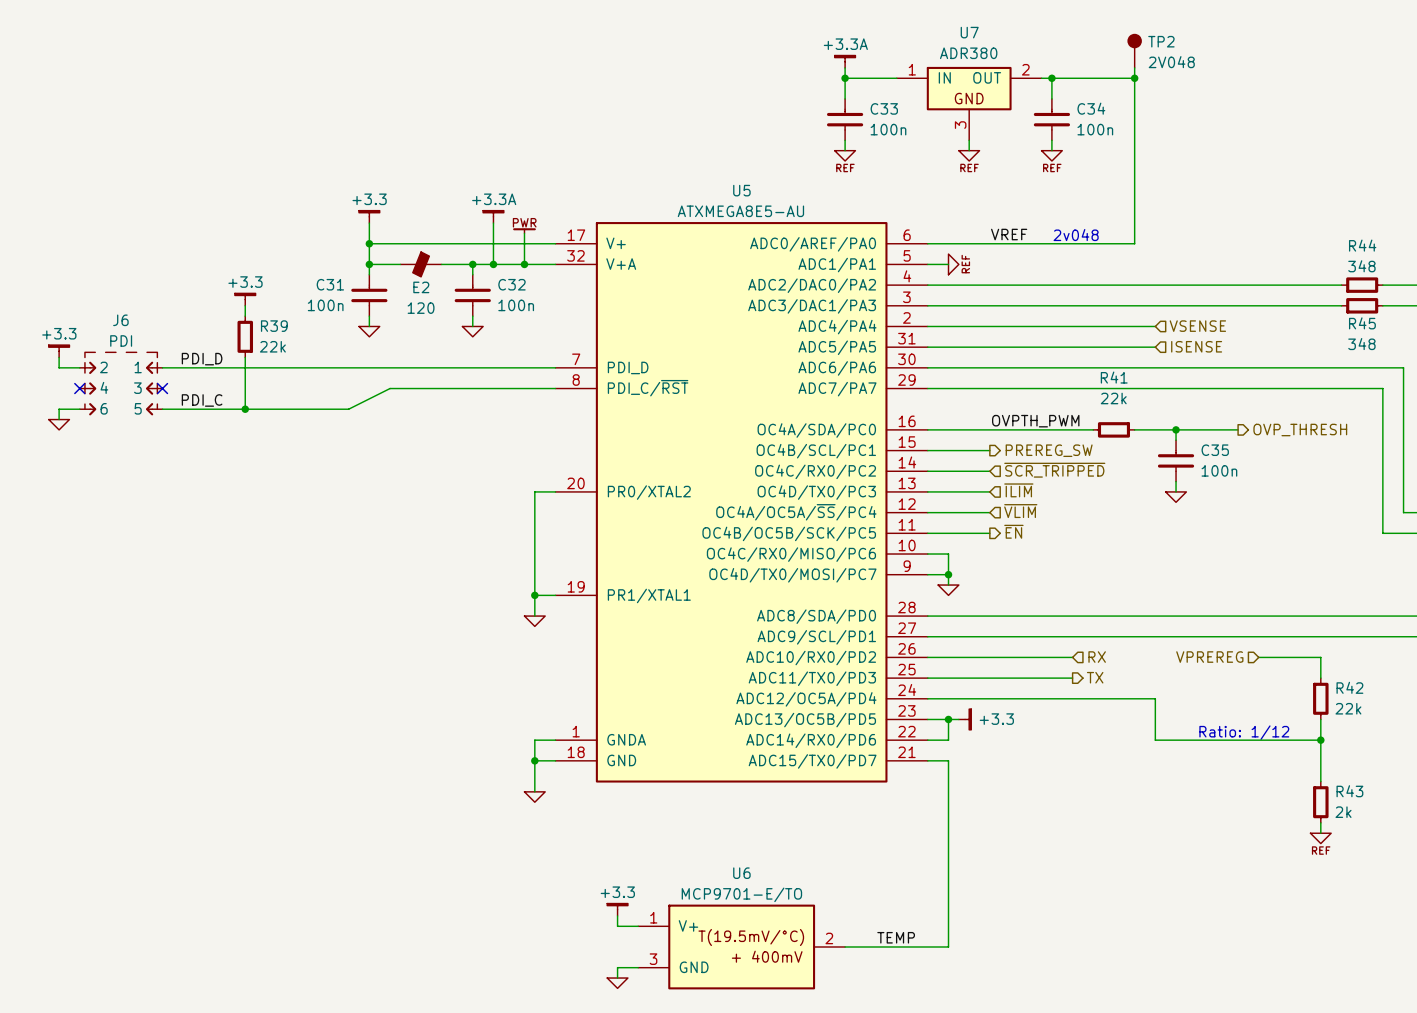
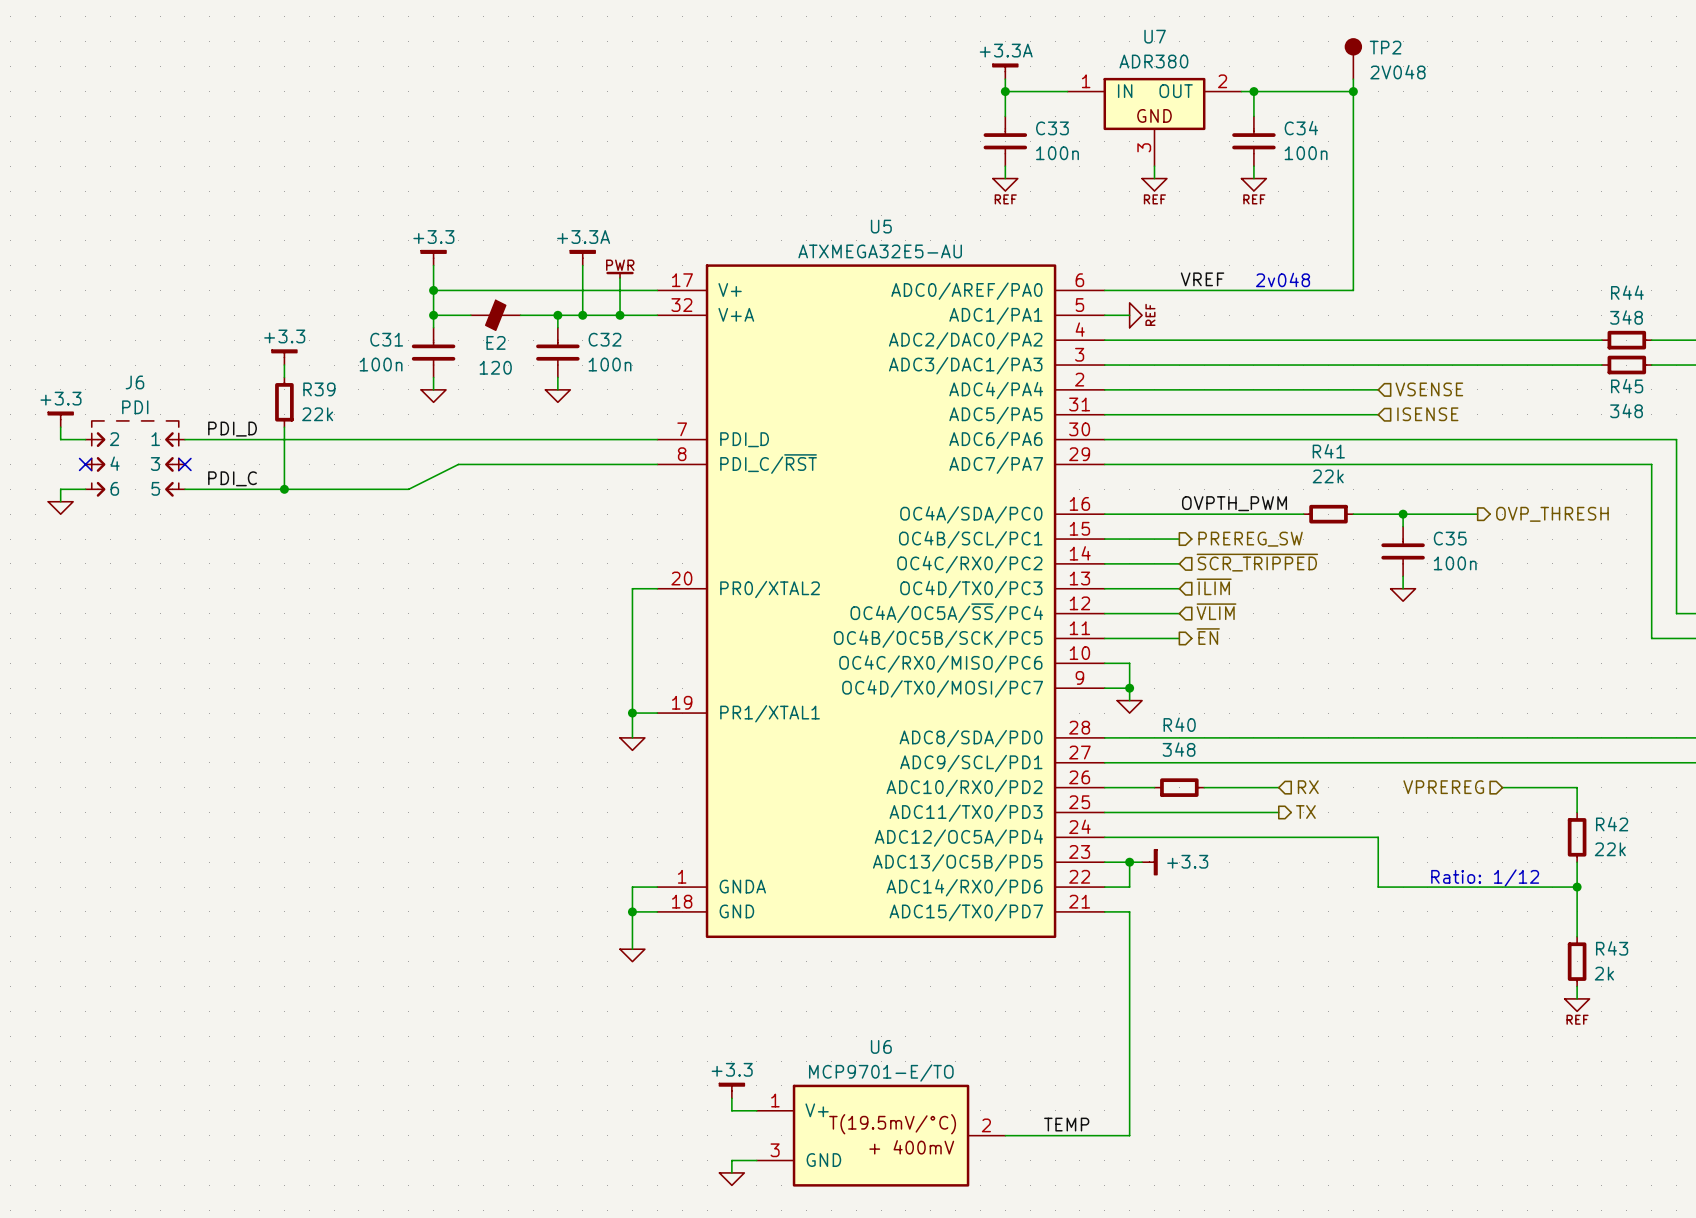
U5 value: ATXMEGA8E5-AU (740, 211) -> ATXMEGA32E5-AU (880, 251)
wire: (969, 657) (1010, 657) -> none
R40: none -> 348 (1179, 787)

